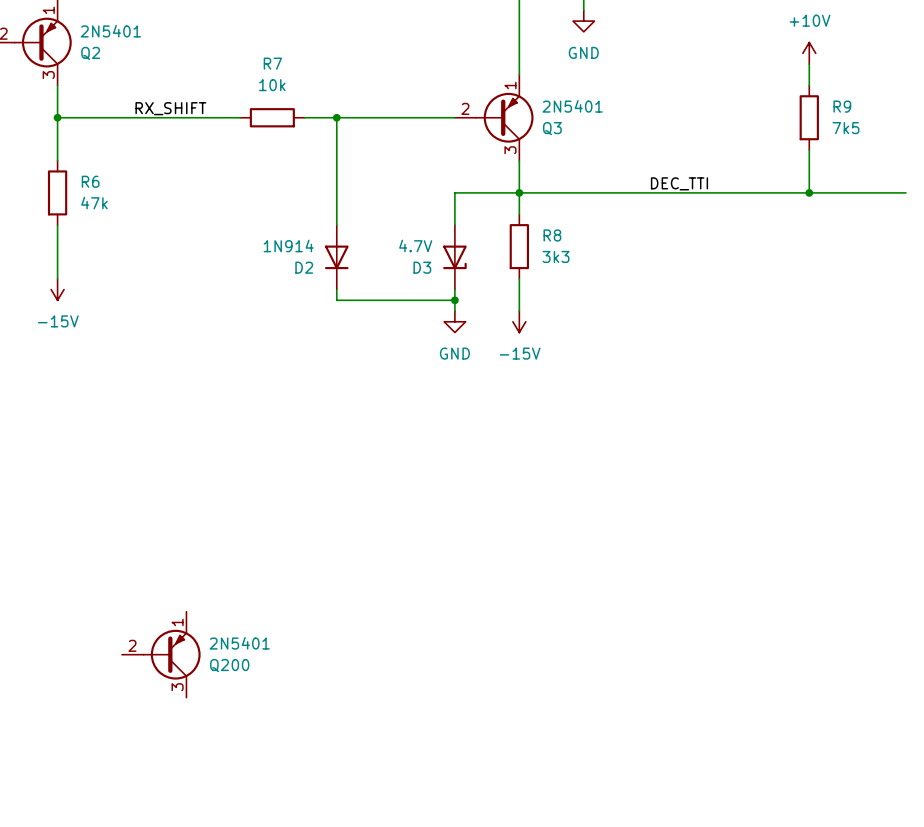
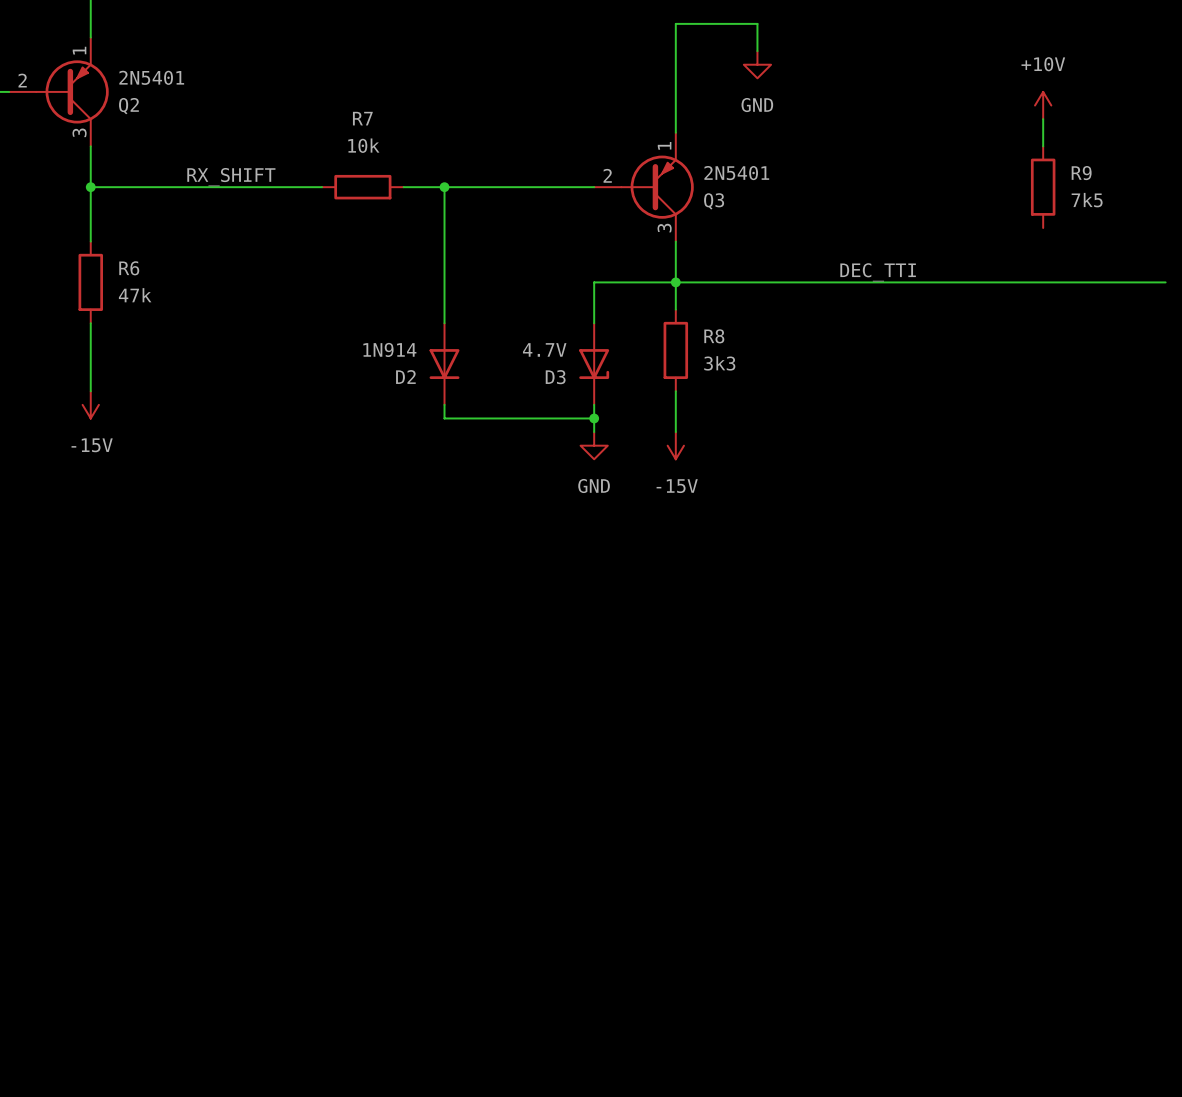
wire: (809, 149) (809, 192) -> none
junction: (809, 192) -> none
Q200: 2N5401 (161, 654) -> none

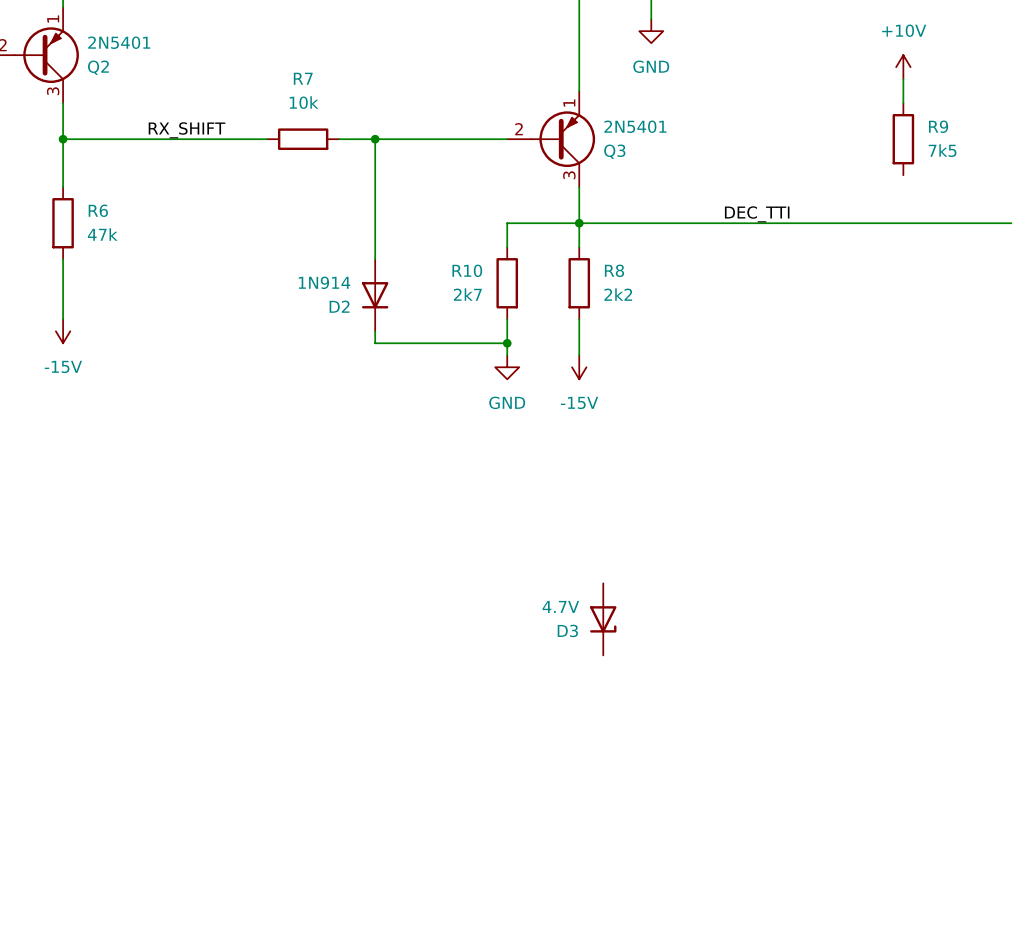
R10: none -> 2k7 (507, 283)
R8 value: 3k3 (719, 363) -> 2k2 (618, 294)
D3 position: (594, 364) -> (603, 619)

